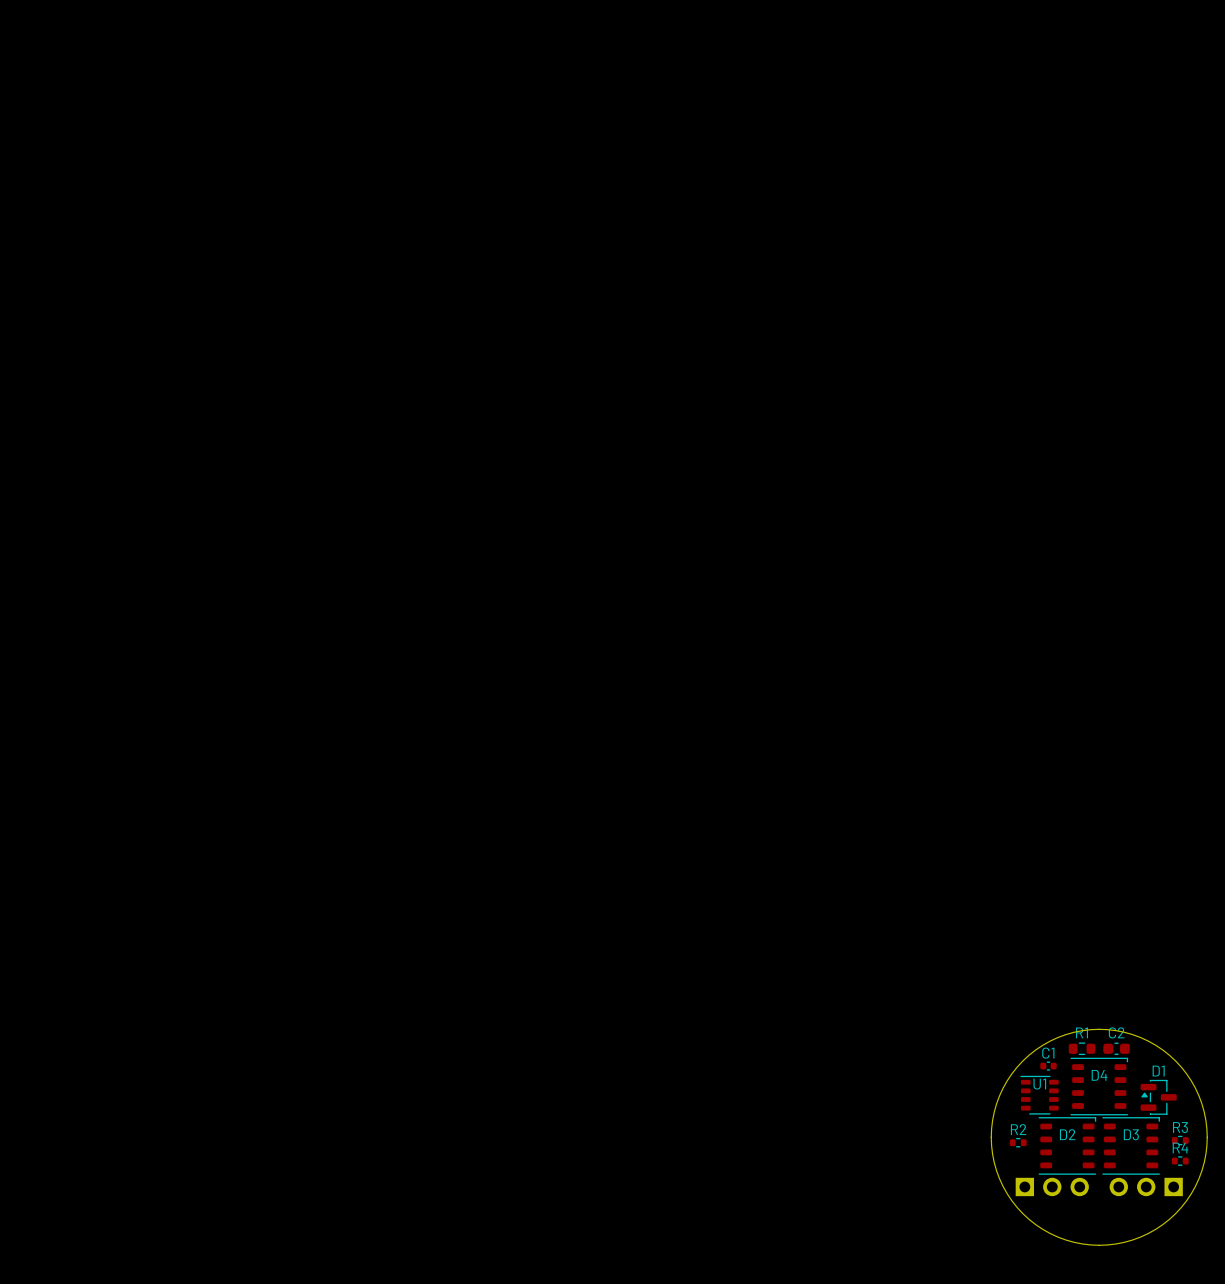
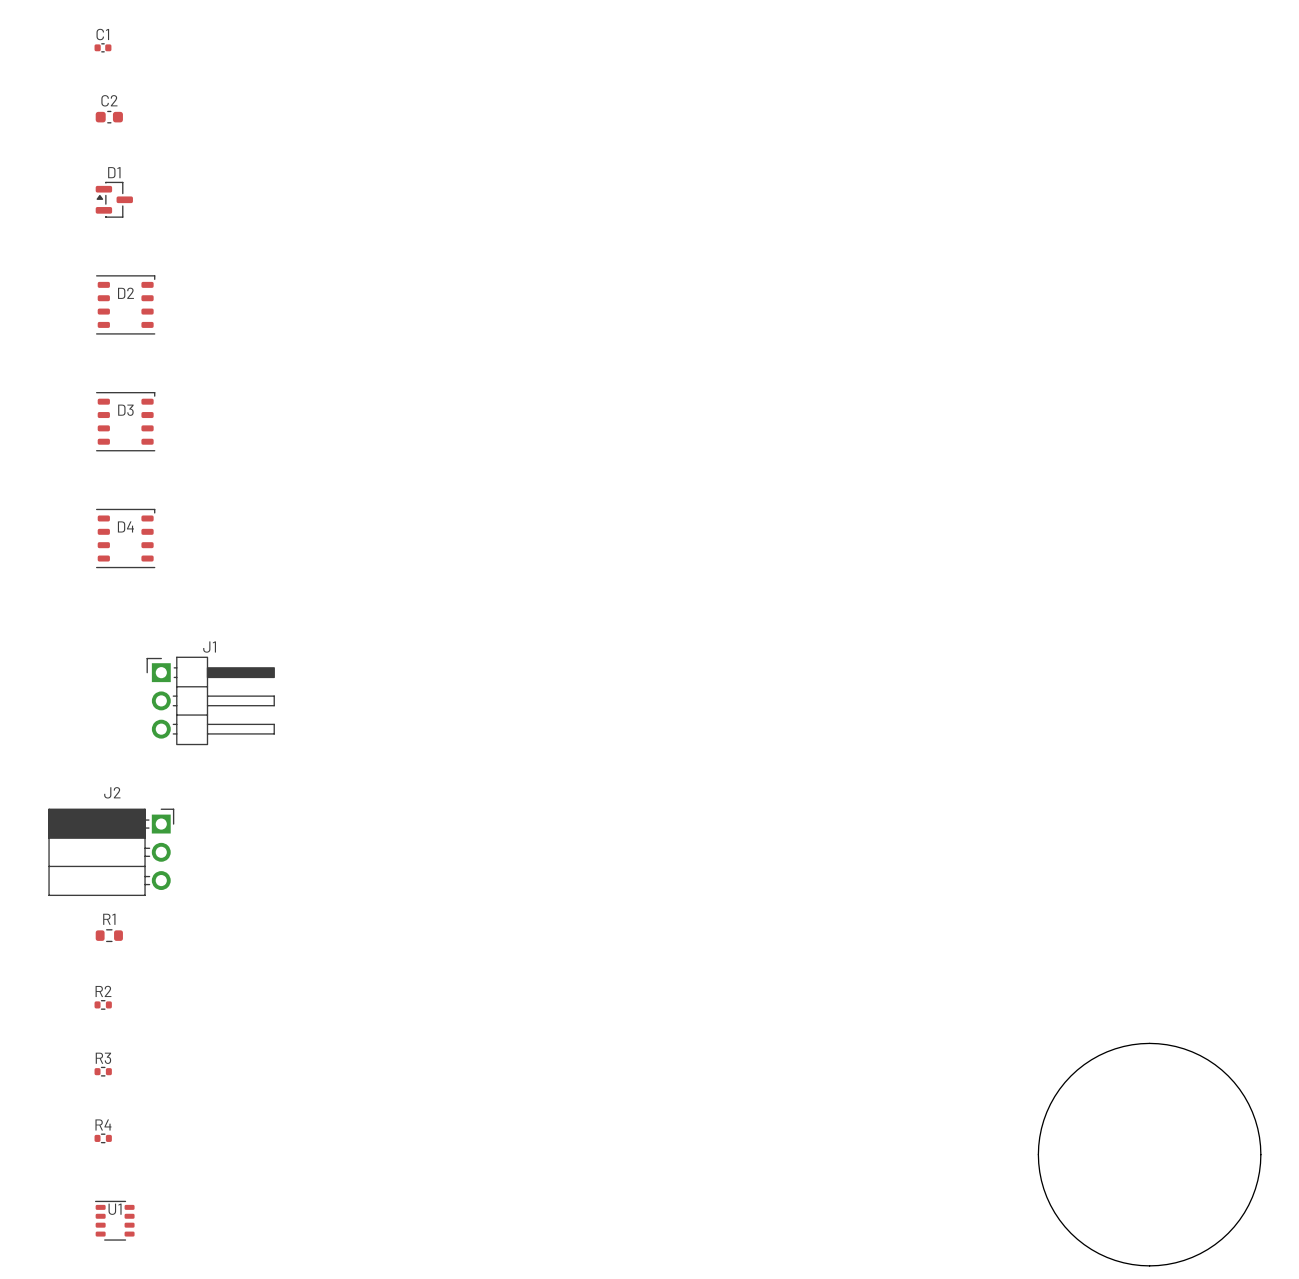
J1: none -> (210, 700)
J2: none -> (111, 852)
R1 position: (1081, 1048) -> (109, 935)
C2 position: (1116, 1048) -> (109, 117)
C1 position: (1048, 1066) -> (102, 47)
D4 position: (1099, 1086) -> (125, 538)
U1 position: (1039, 1095) -> (114, 1220)
D1 position: (1158, 1097) -> (114, 199)
R3 position: (1180, 1140) -> (103, 1071)
R2 position: (1018, 1142) -> (103, 1004)
D2 position: (1067, 1145) -> (125, 304)
D3 position: (1131, 1145) -> (125, 421)
R4 position: (1180, 1161) -> (103, 1138)
part: (1052, 1186) -> none
part: (1146, 1186) -> none

